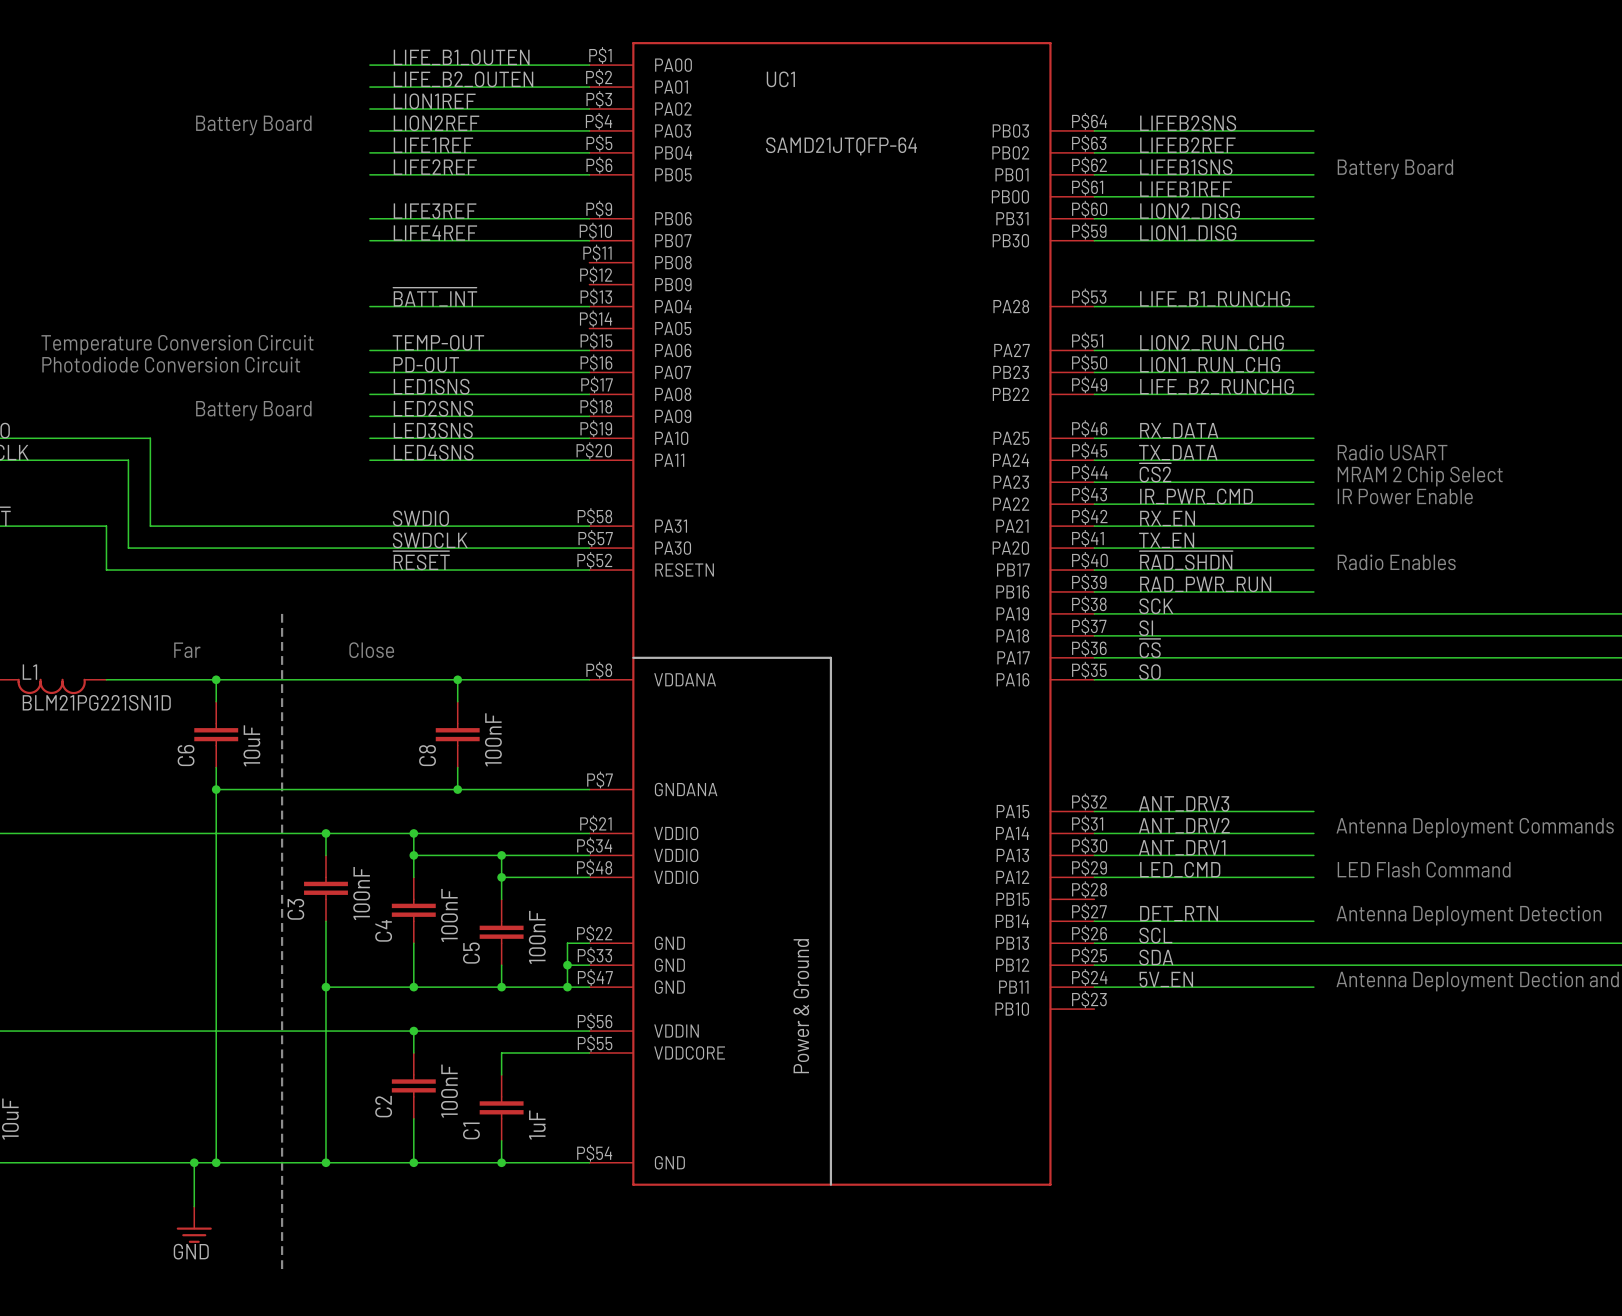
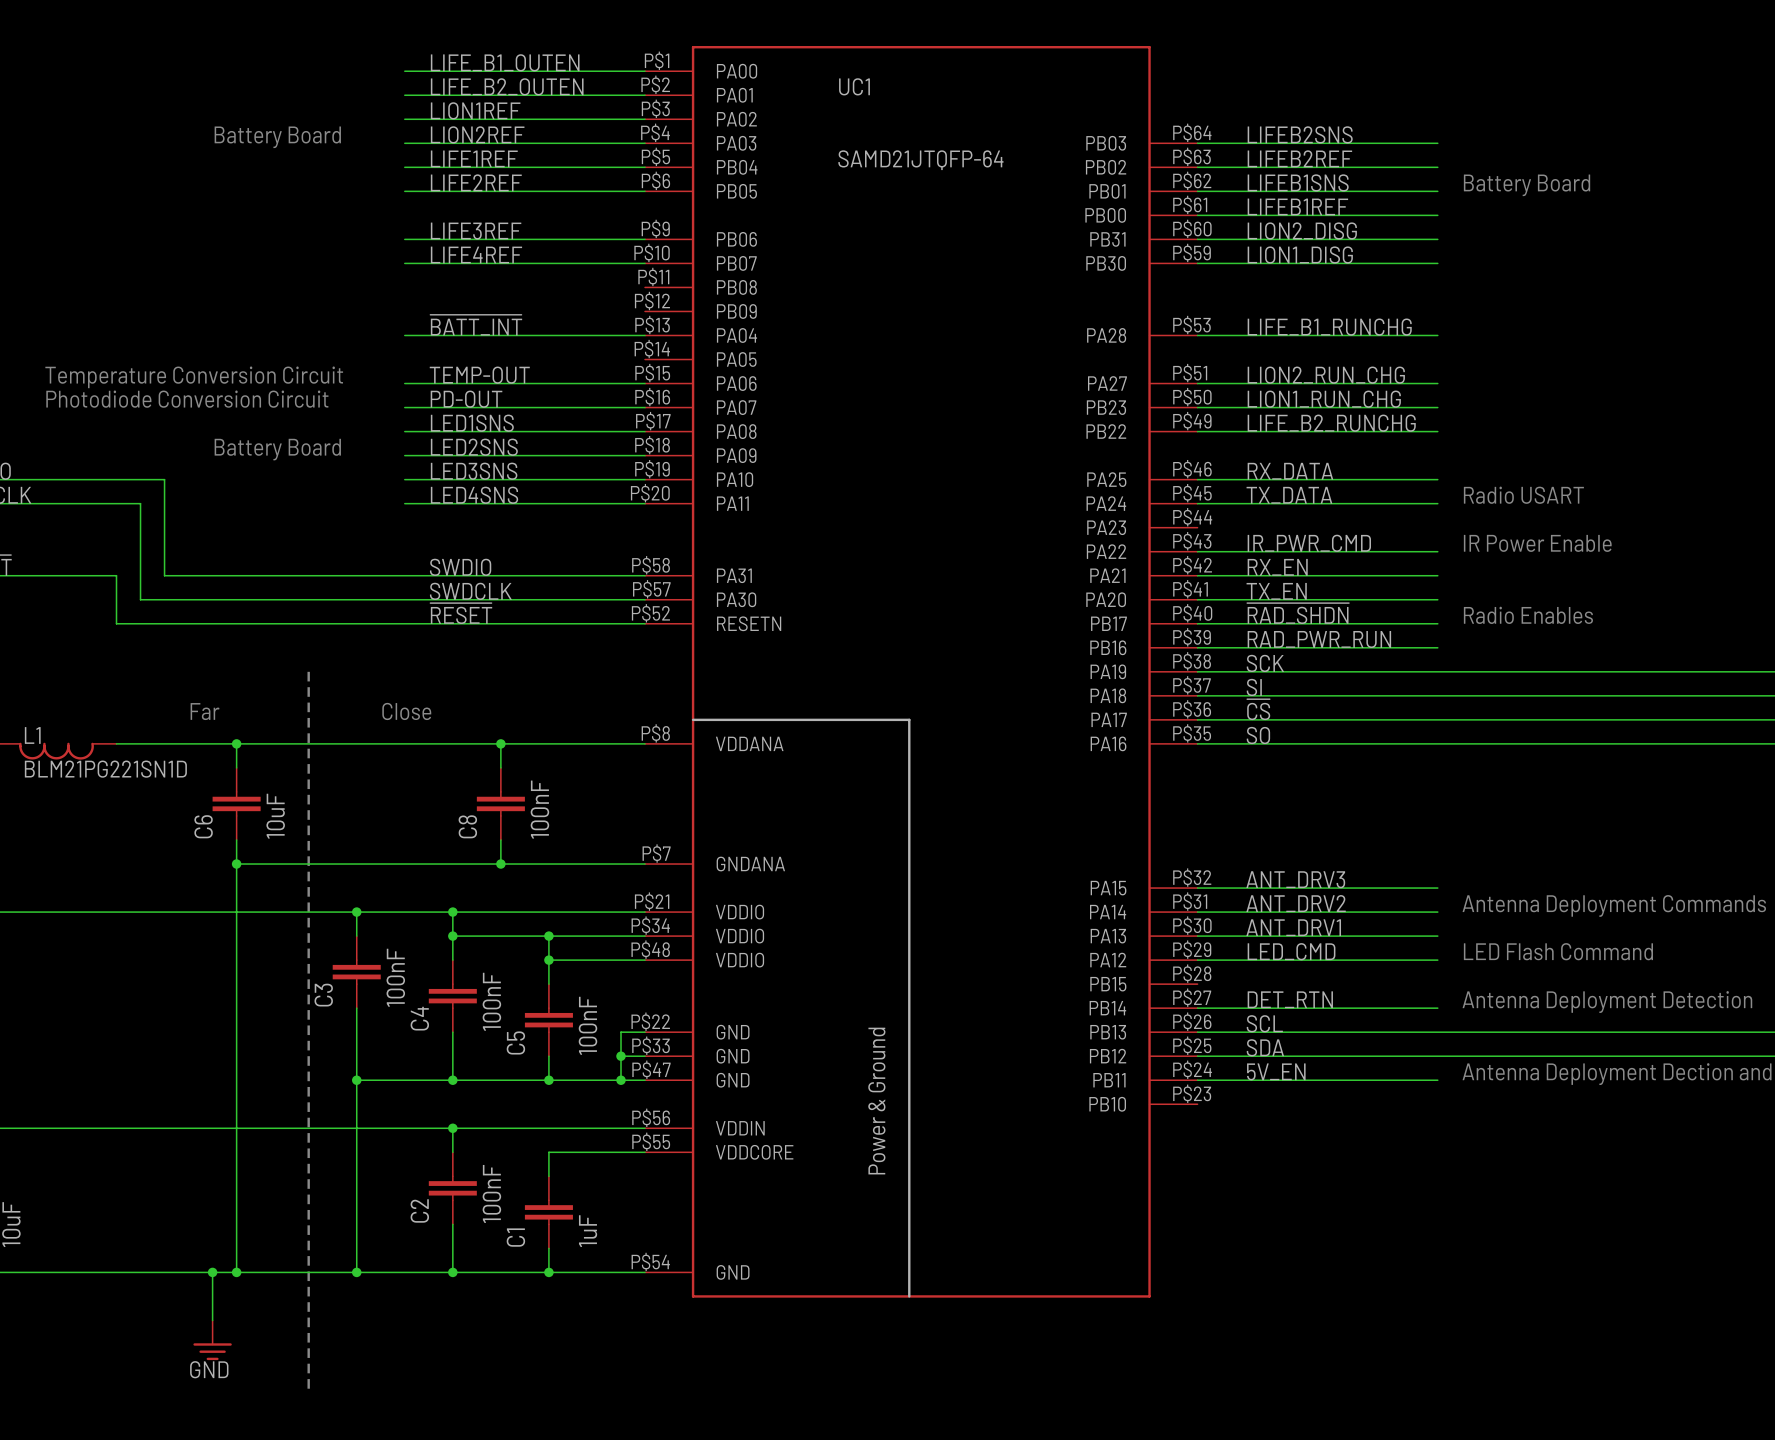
label: ~{CS2} (1155, 472) -> none
text: MRAM 2 Chip Select (1420, 476) -> none
wire: (1094, 482) (1313, 482) -> none

